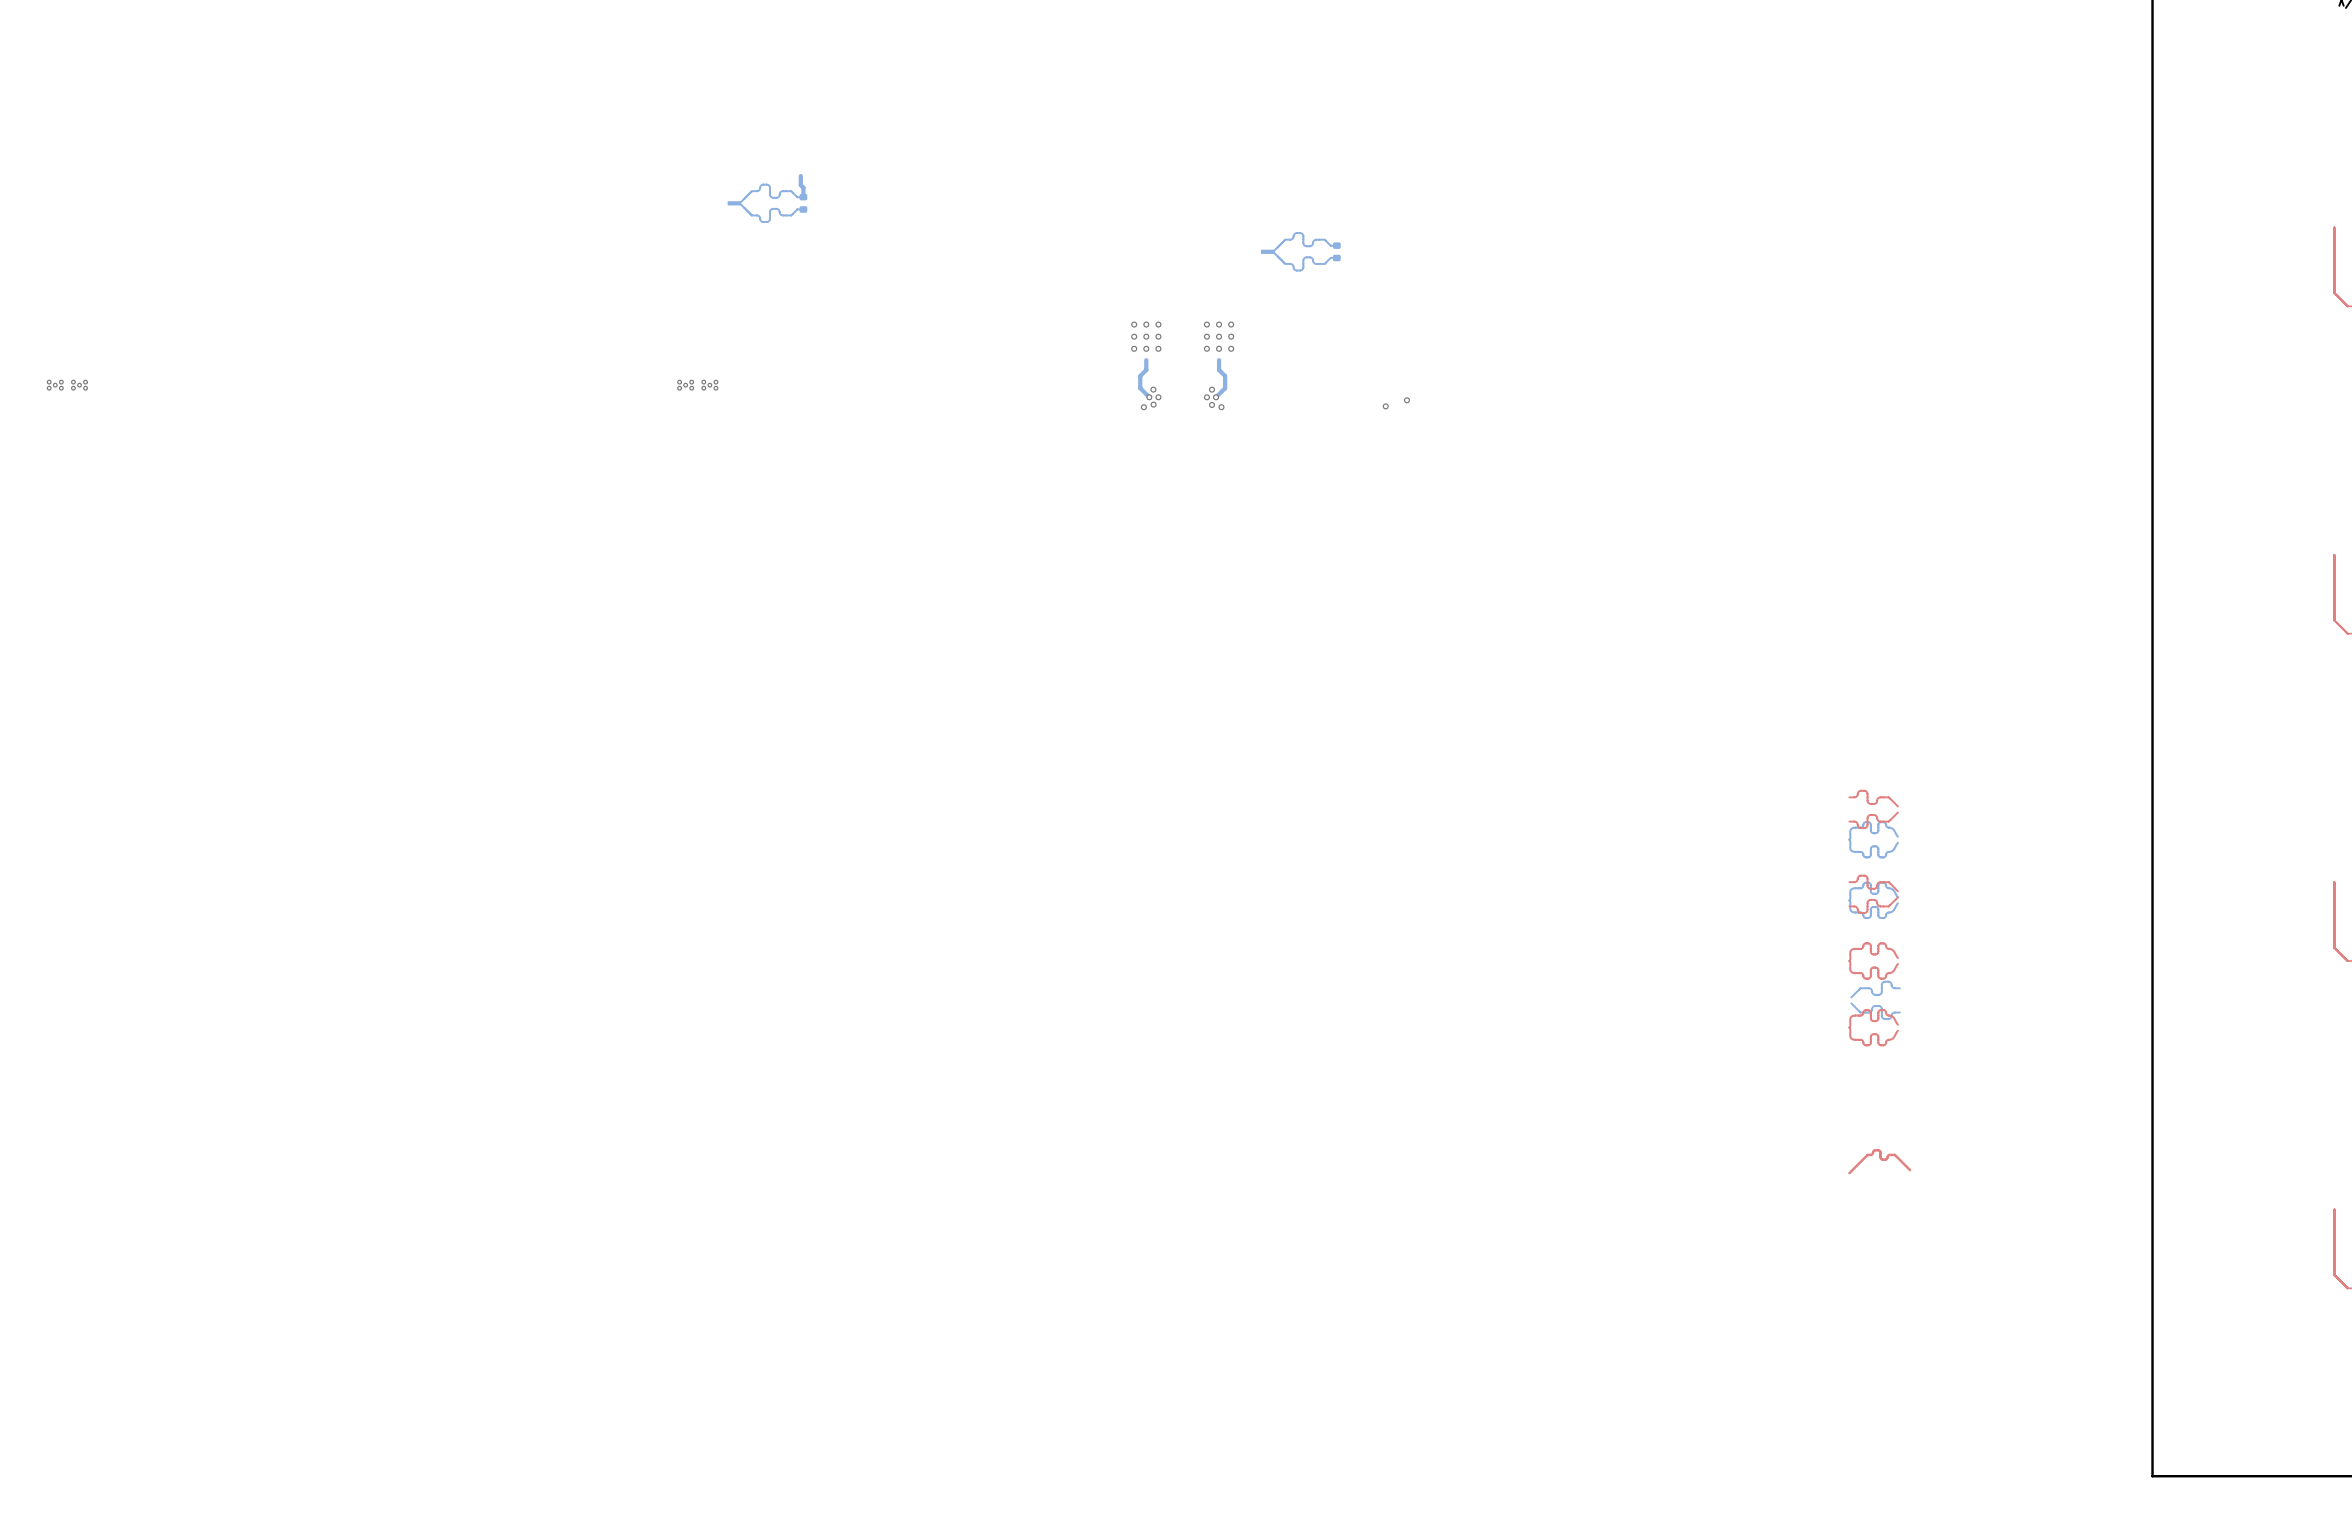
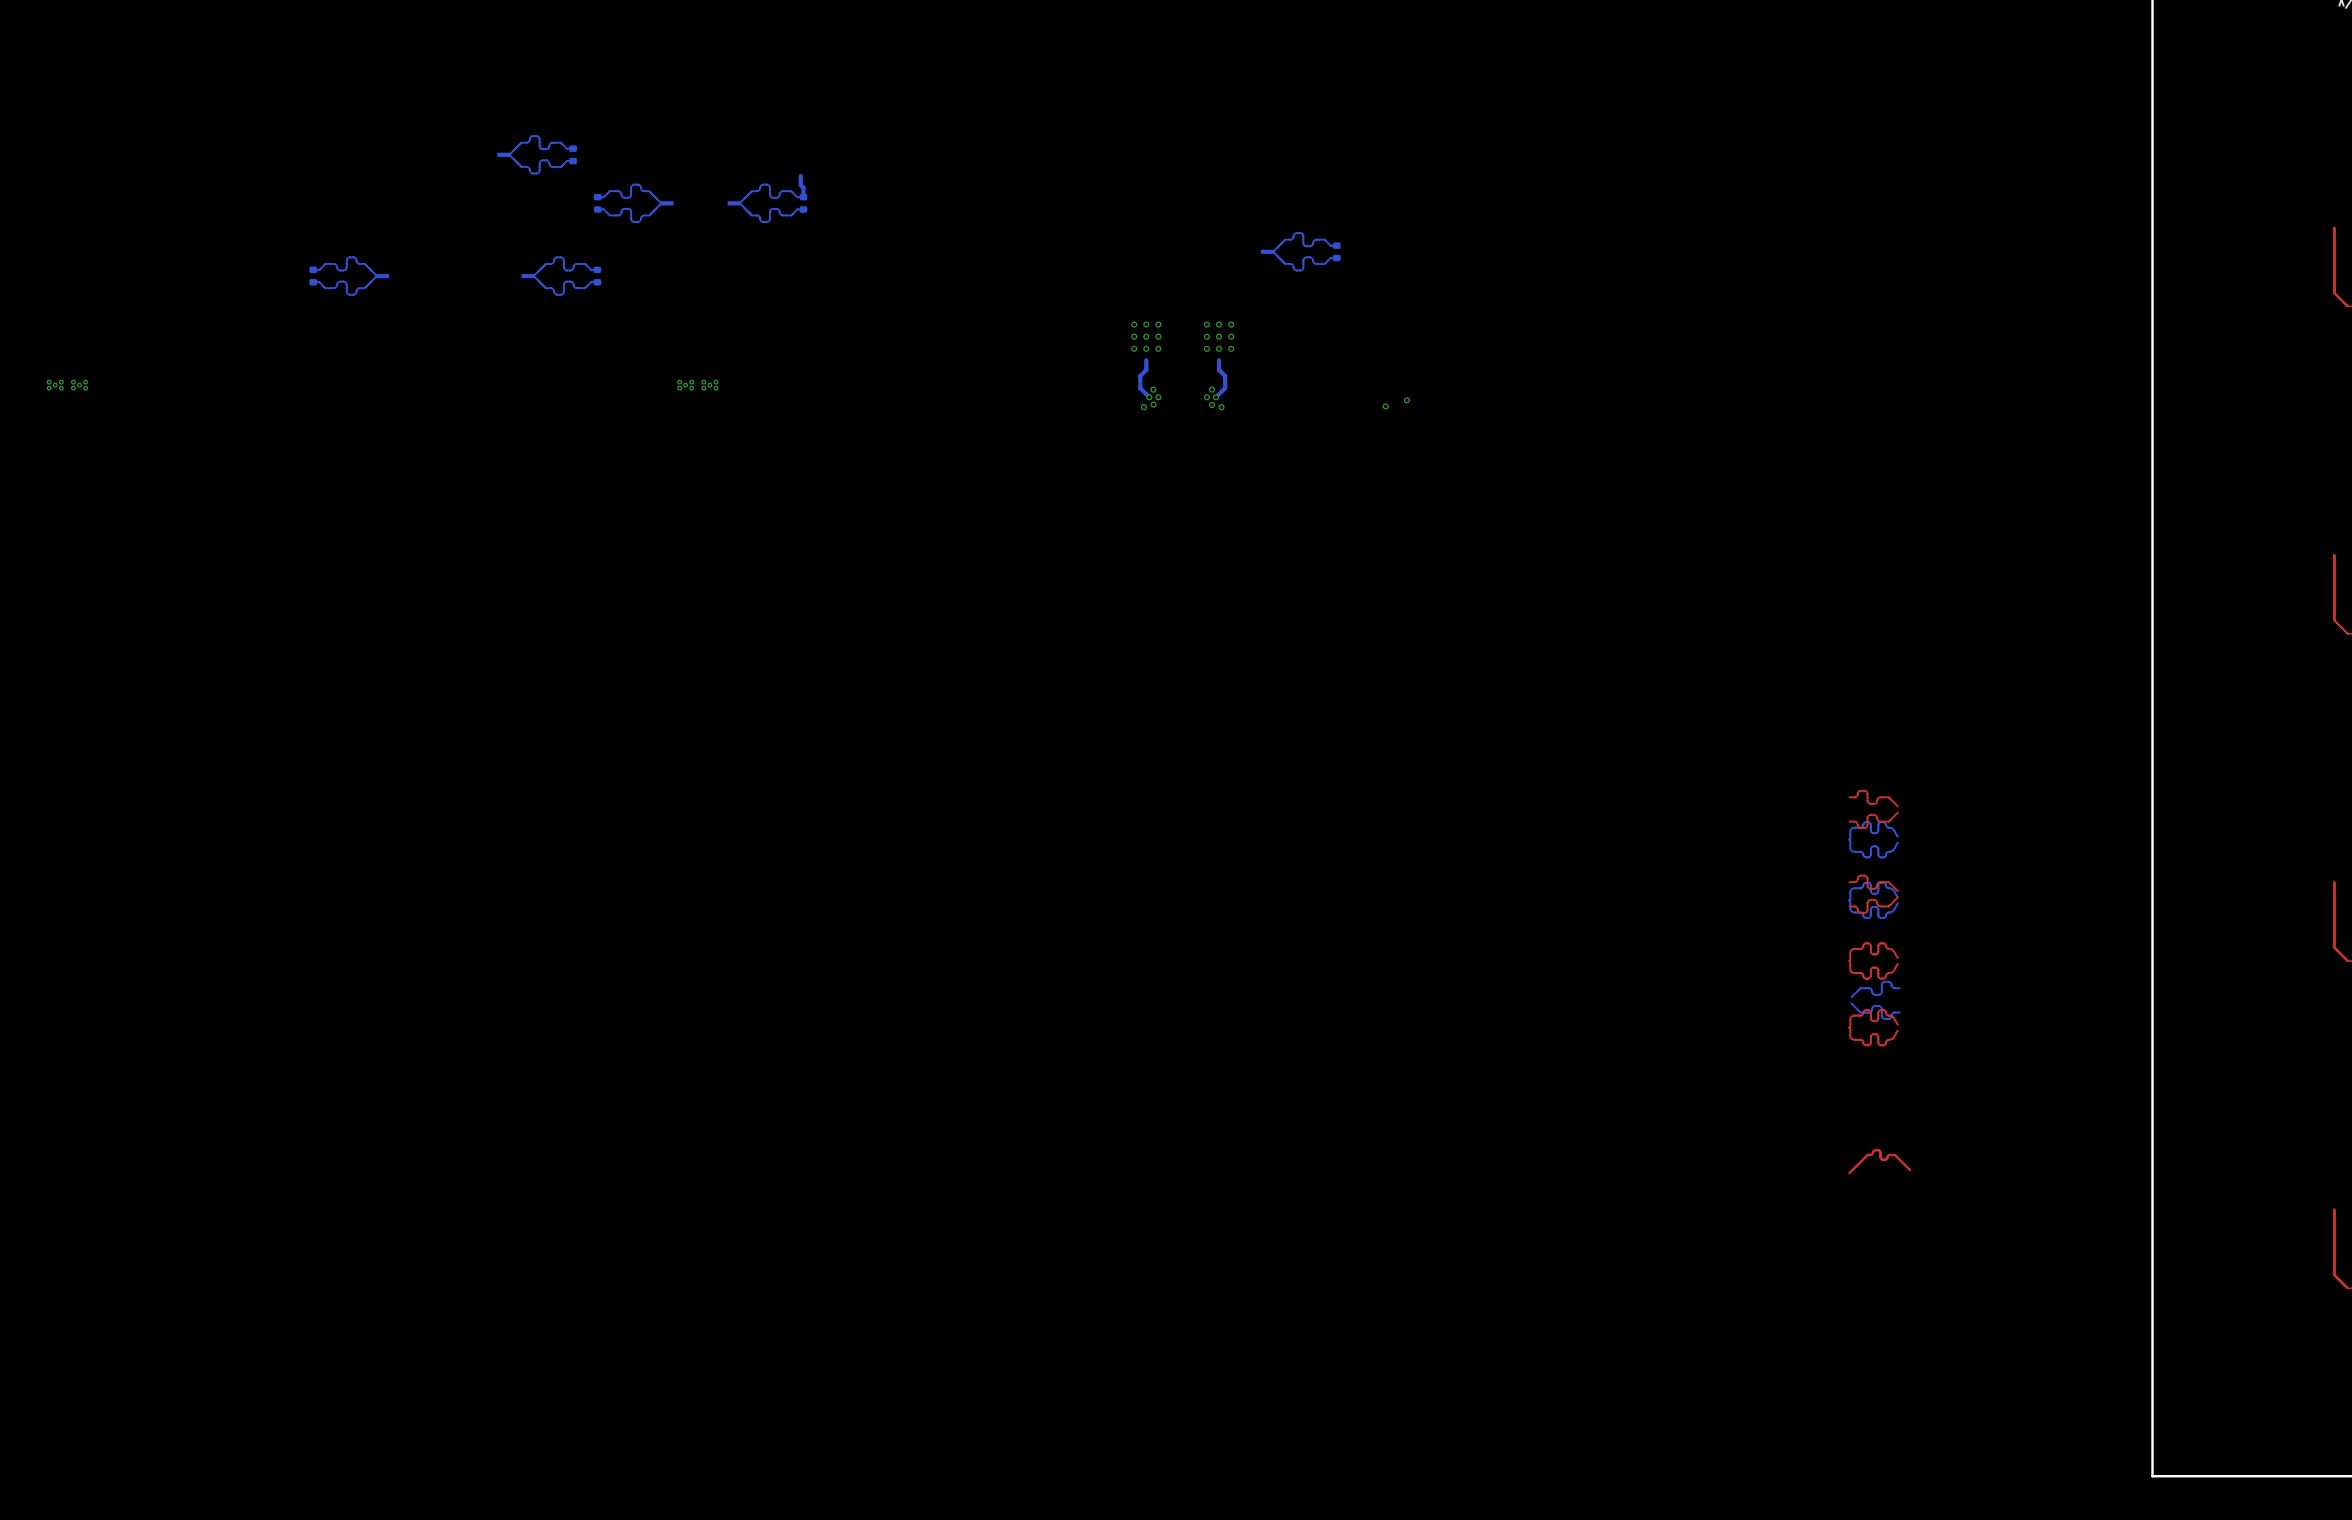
bottom track: none -> (521, 142) (527, 142) (531, 136) (536, 136) (539, 138) (541, 149) (547, 148) (552, 142) (560, 142) (567, 148) (570, 148)
part: none -> (509, 154)
part: none -> (573, 154)
bottom track: none -> (570, 160) (567, 160) (560, 166) (552, 166) (547, 160) (541, 160) (539, 162) (539, 171) (536, 173) (531, 172) (527, 167) (521, 166)
bottom track: none -> (649, 191) (642, 190) (639, 185) (634, 184) (631, 186) (631, 195) (628, 197) (623, 197) (618, 191) (609, 191) (603, 197) (600, 197)
part: none -> (597, 203)
part: none -> (660, 203)
bottom track: none -> (600, 209) (603, 209) (609, 215) (618, 215) (623, 209) (629, 209) (631, 220) (634, 222) (639, 221) (643, 215) (649, 215)
bottom track: none -> (364, 263) (358, 263) (355, 258) (349, 257) (346, 259) (346, 267) (344, 270) (338, 270) (333, 263) (325, 263) (319, 269) (316, 269)
bottom track: none -> (545, 263) (552, 263) (555, 258) (561, 257) (563, 259) (565, 270) (571, 270) (576, 263) (585, 263) (591, 269) (594, 269)
part: none -> (313, 276)
part: none -> (376, 276)
part: none -> (534, 276)
part: none -> (597, 276)
bottom track: none -> (316, 282) (319, 282) (325, 288) (333, 288) (338, 282) (344, 281) (346, 292) (349, 294) (355, 294) (358, 288) (364, 288)
bottom track: none -> (594, 282) (591, 282) (585, 288) (576, 288) (572, 282) (566, 281) (563, 284) (563, 292) (560, 294) (555, 294) (552, 288) (545, 288)

